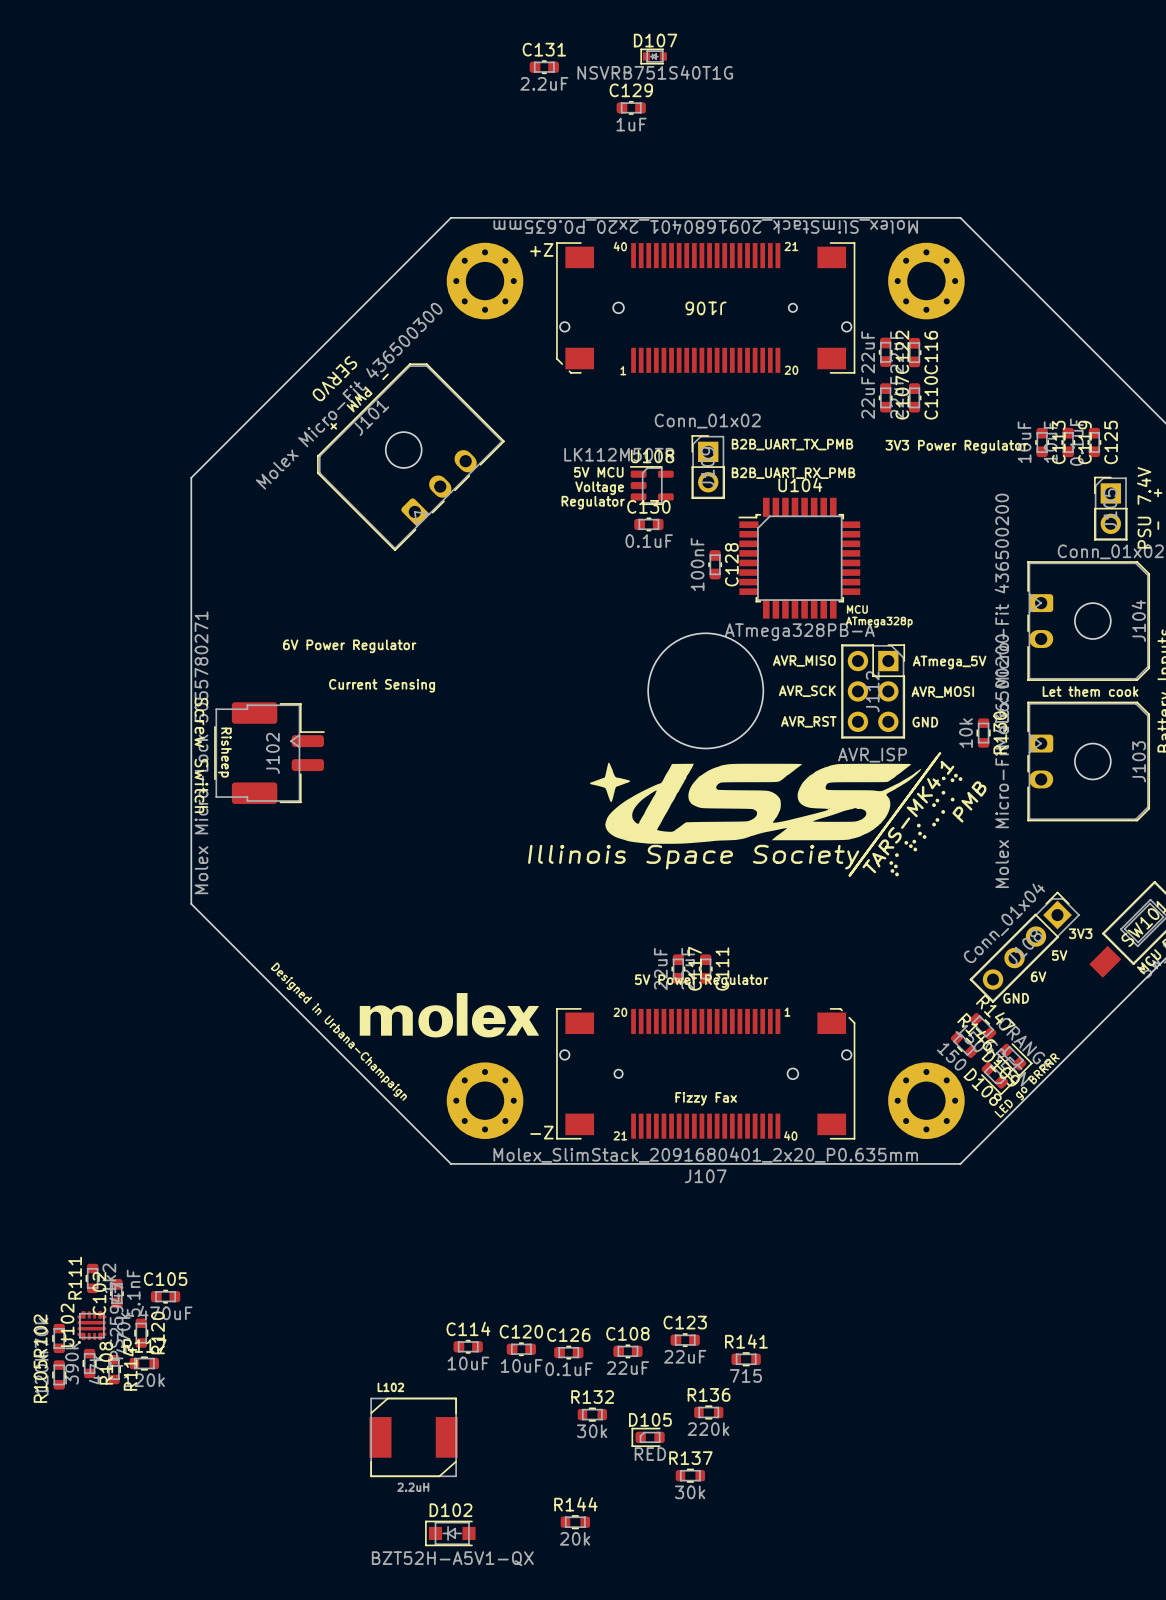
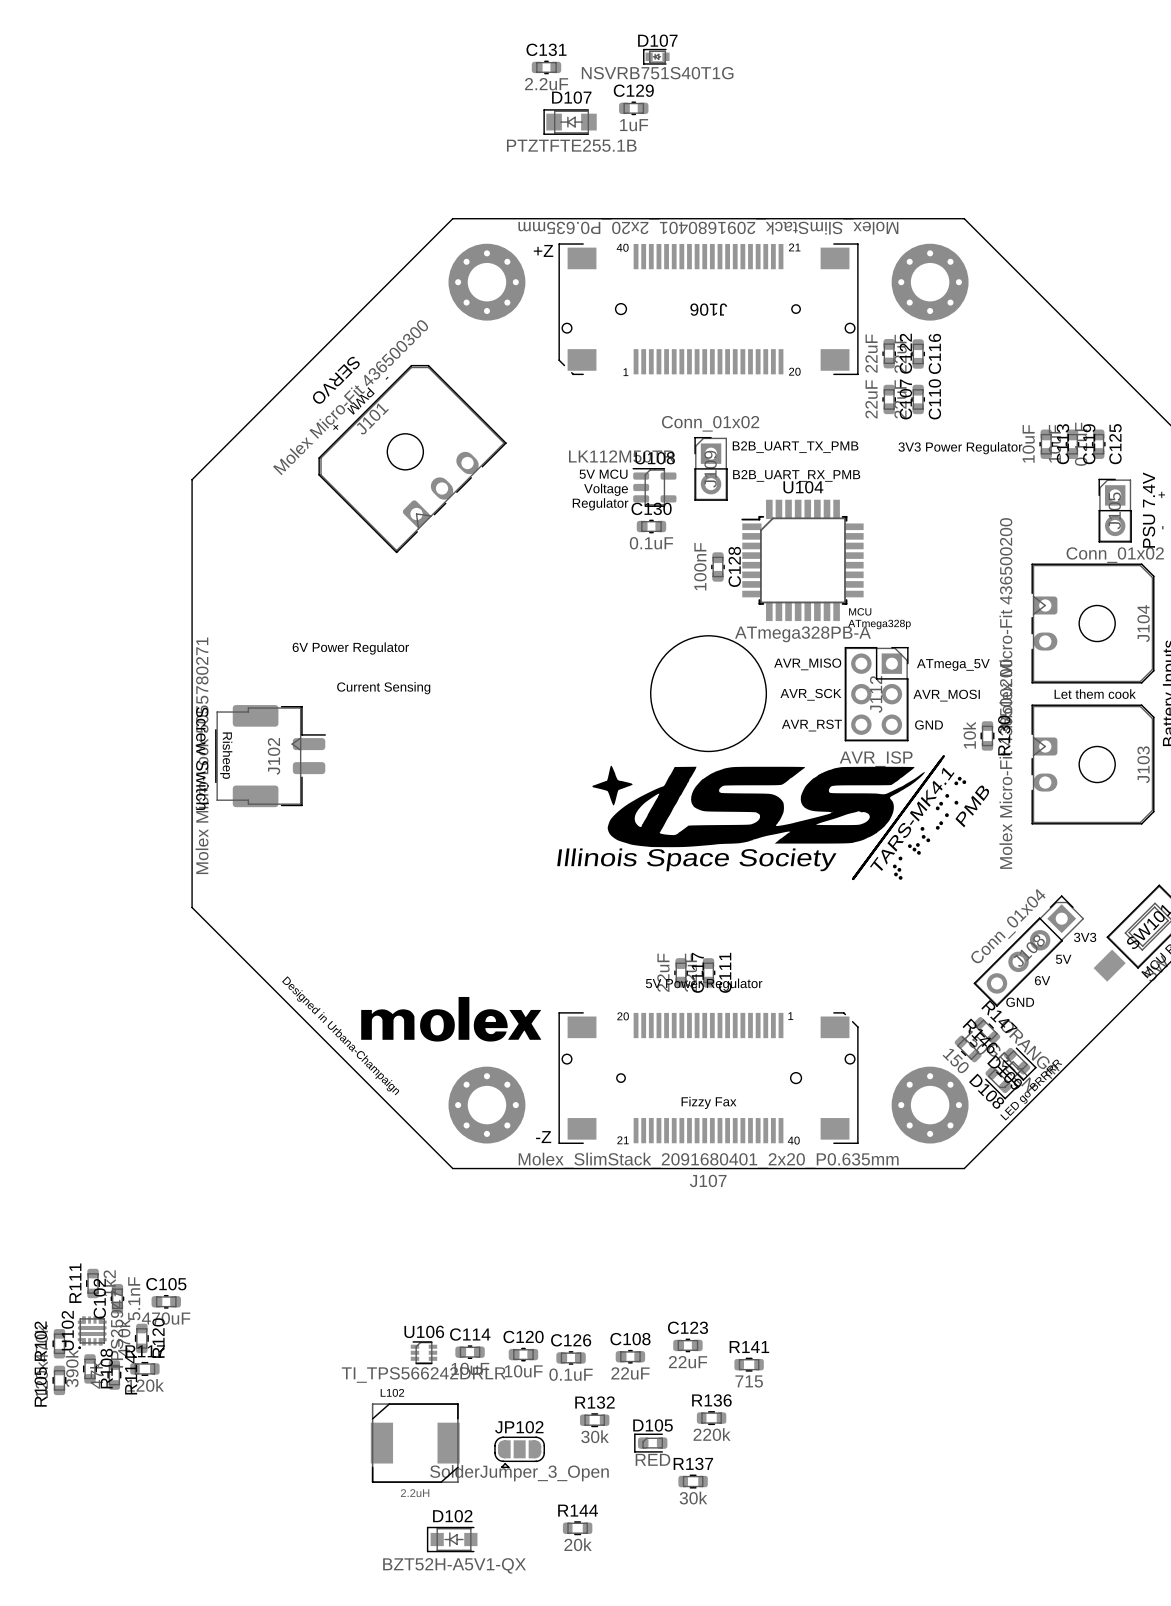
D107: none -> PTZTFTE255.1B (570, 122)
U106: none -> TI_TPS566242DRLR (423, 1352)
JP102: none -> SolderJumper_3_Open (519, 1452)

